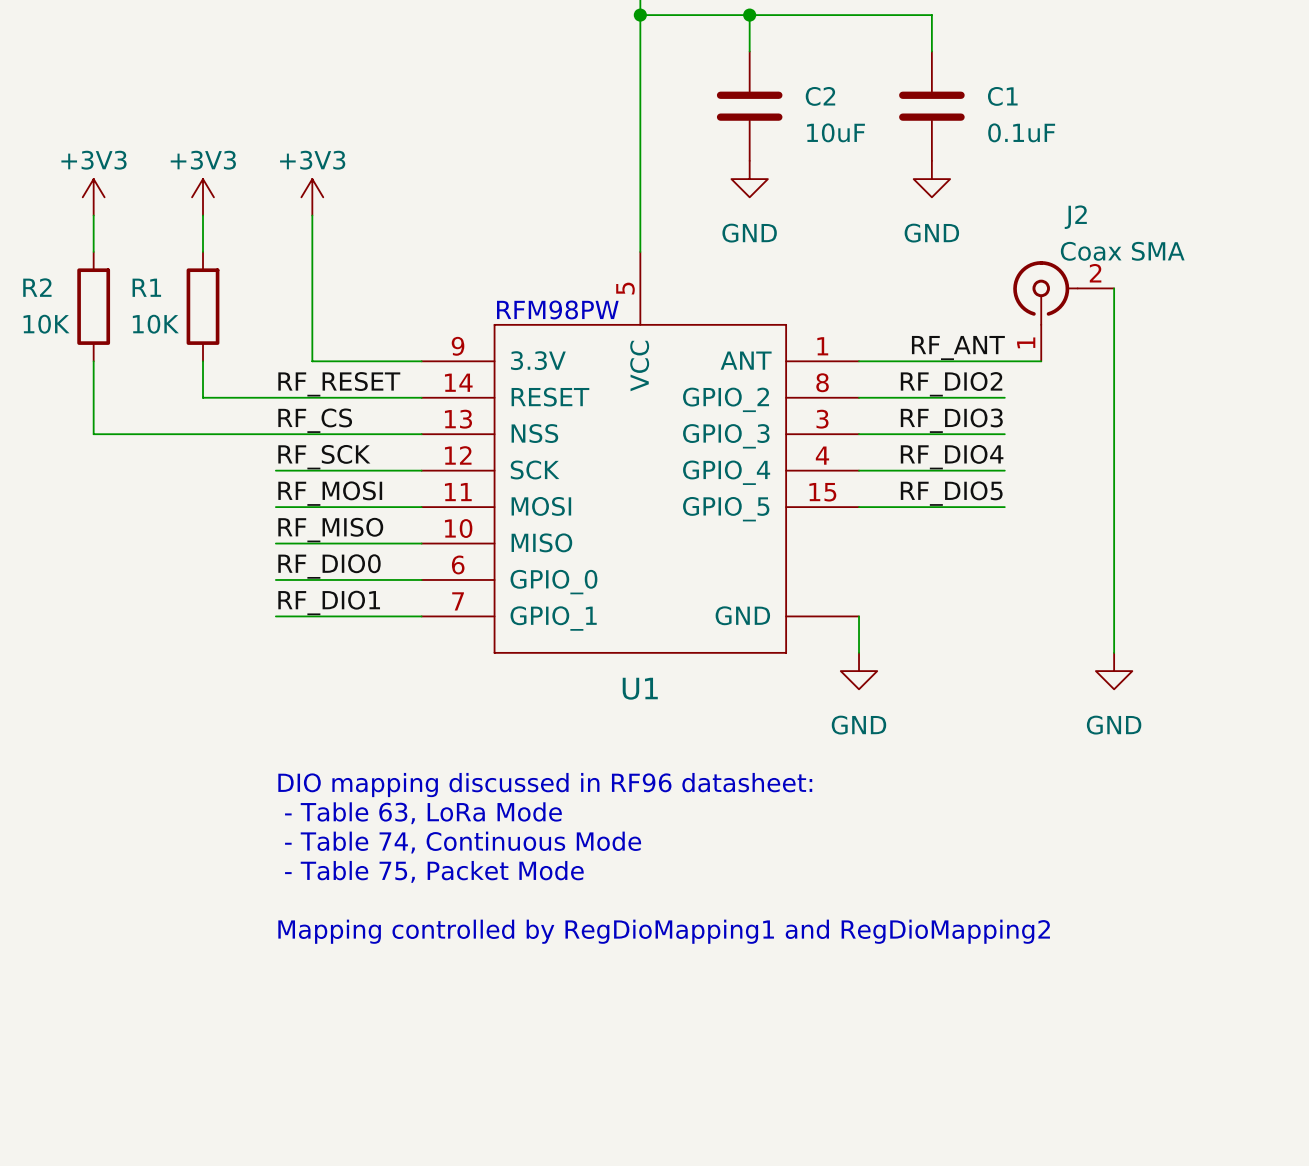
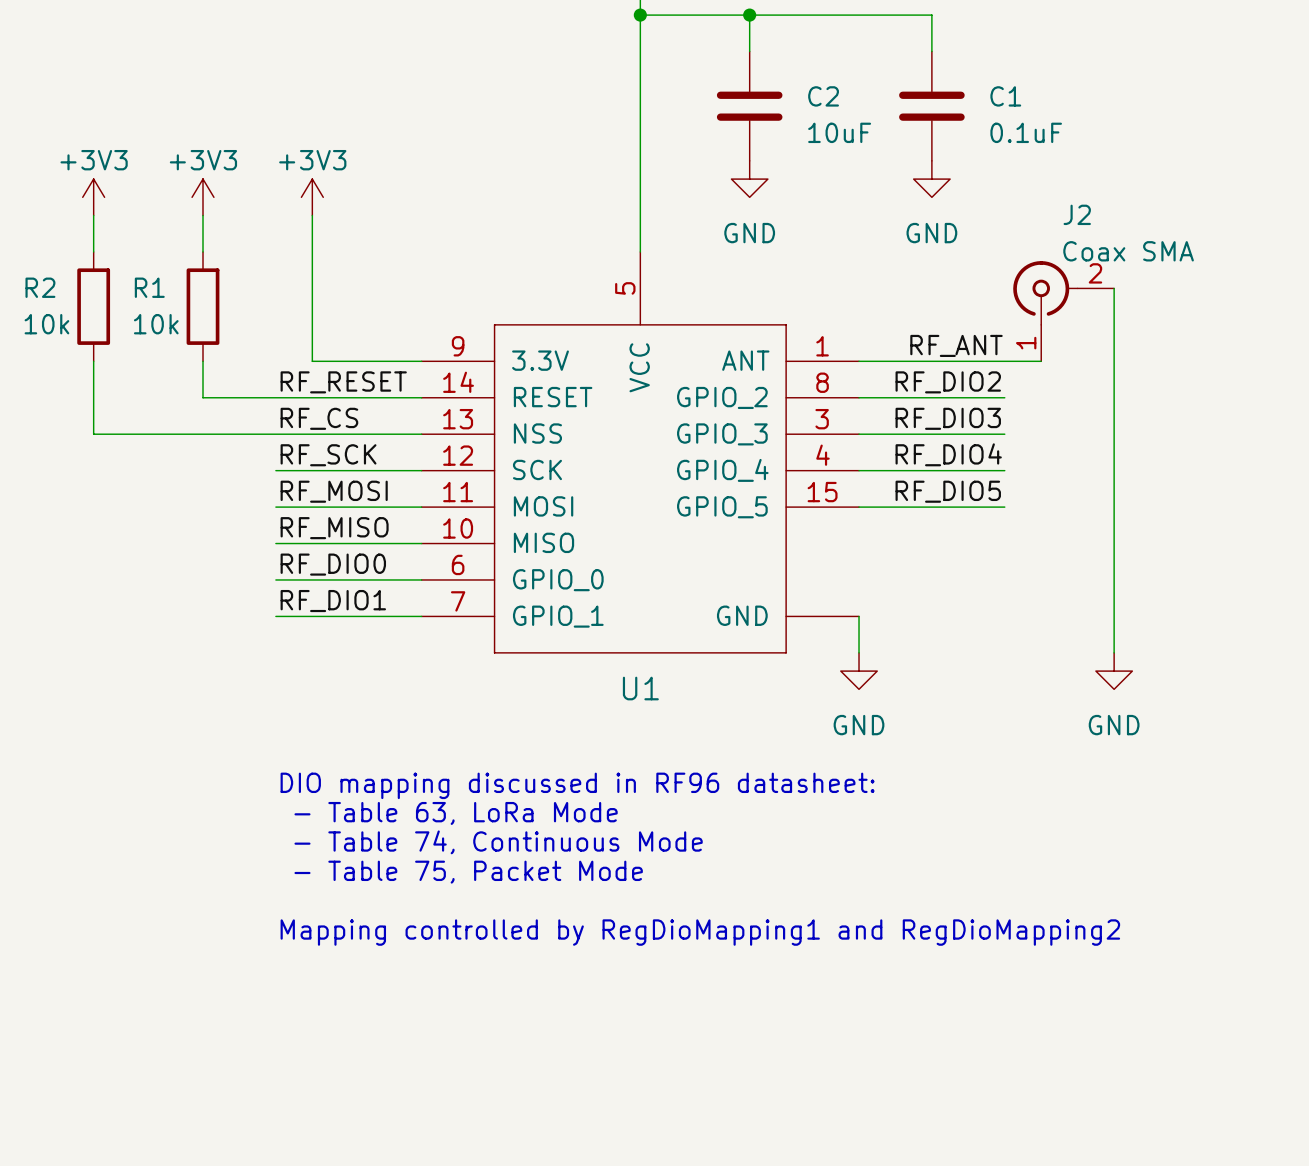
text: RFM98PW (557, 309) -> none
R2 value: 10K (46, 324) -> 10k (46, 324)
R1 value: 10K (155, 324) -> 10k (156, 324)

